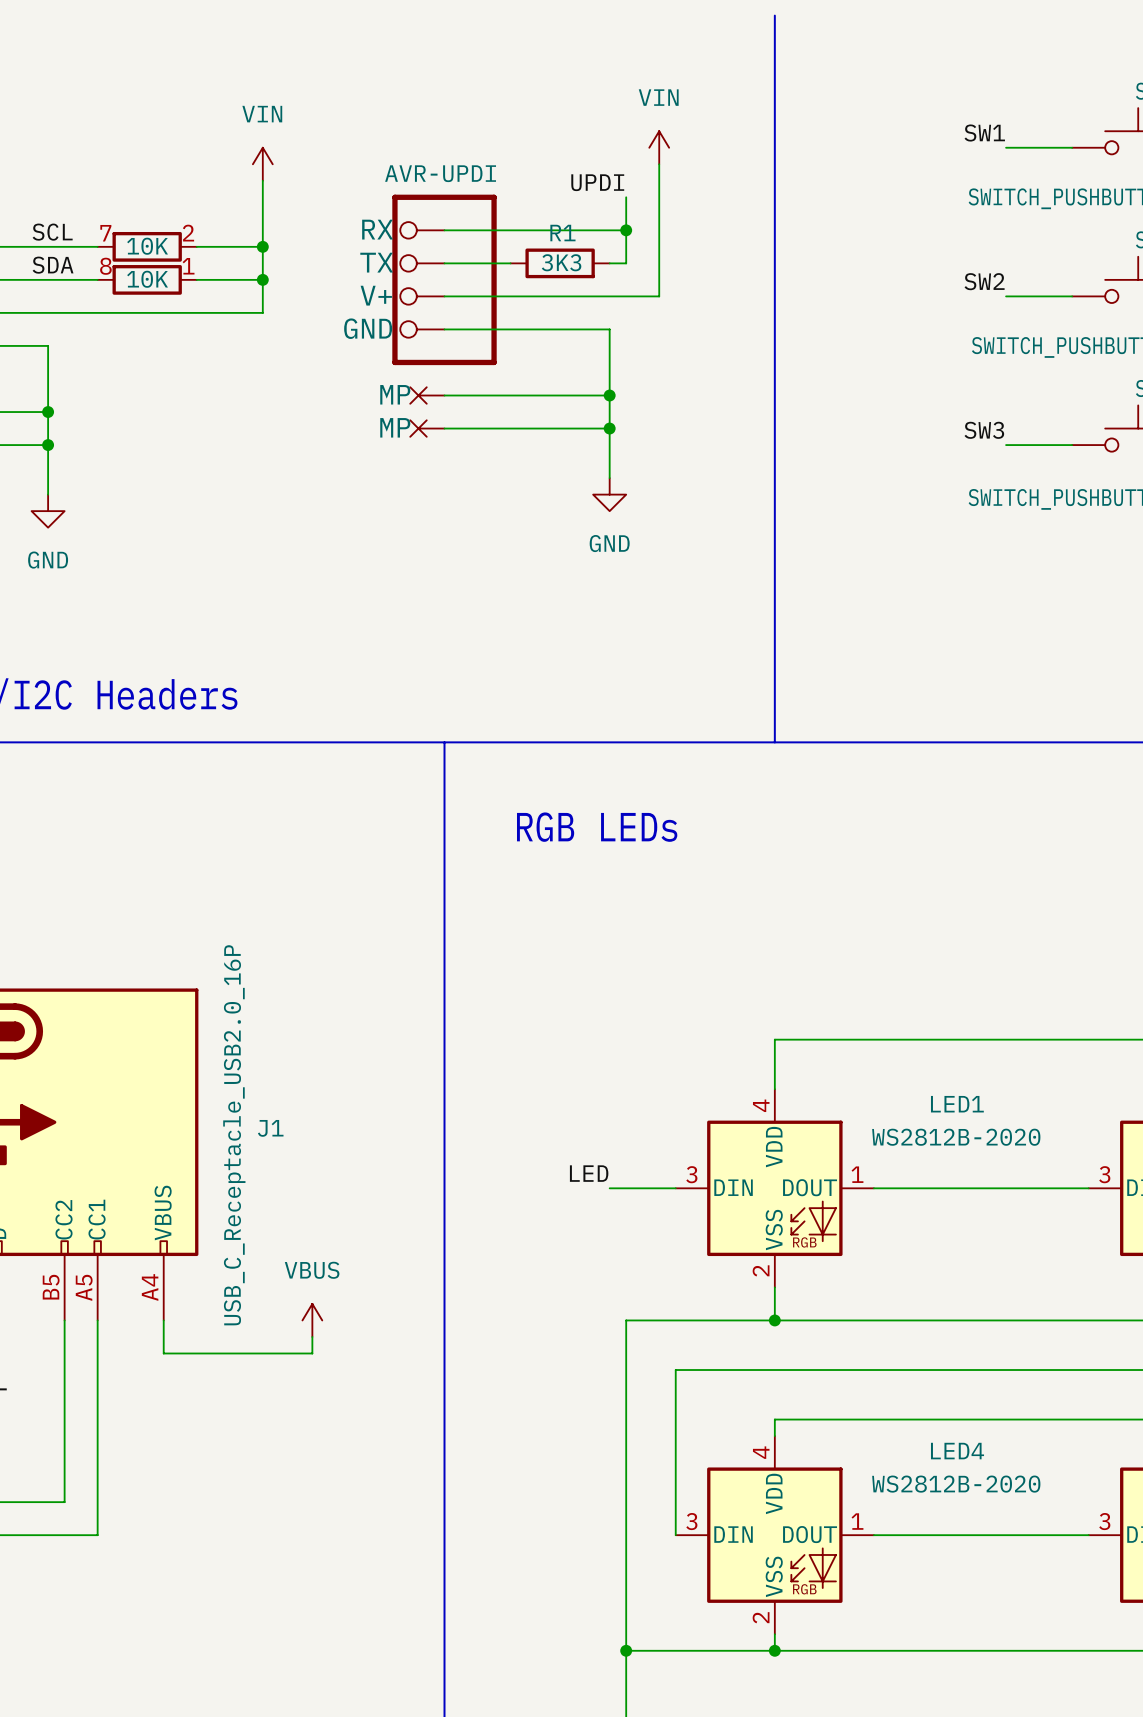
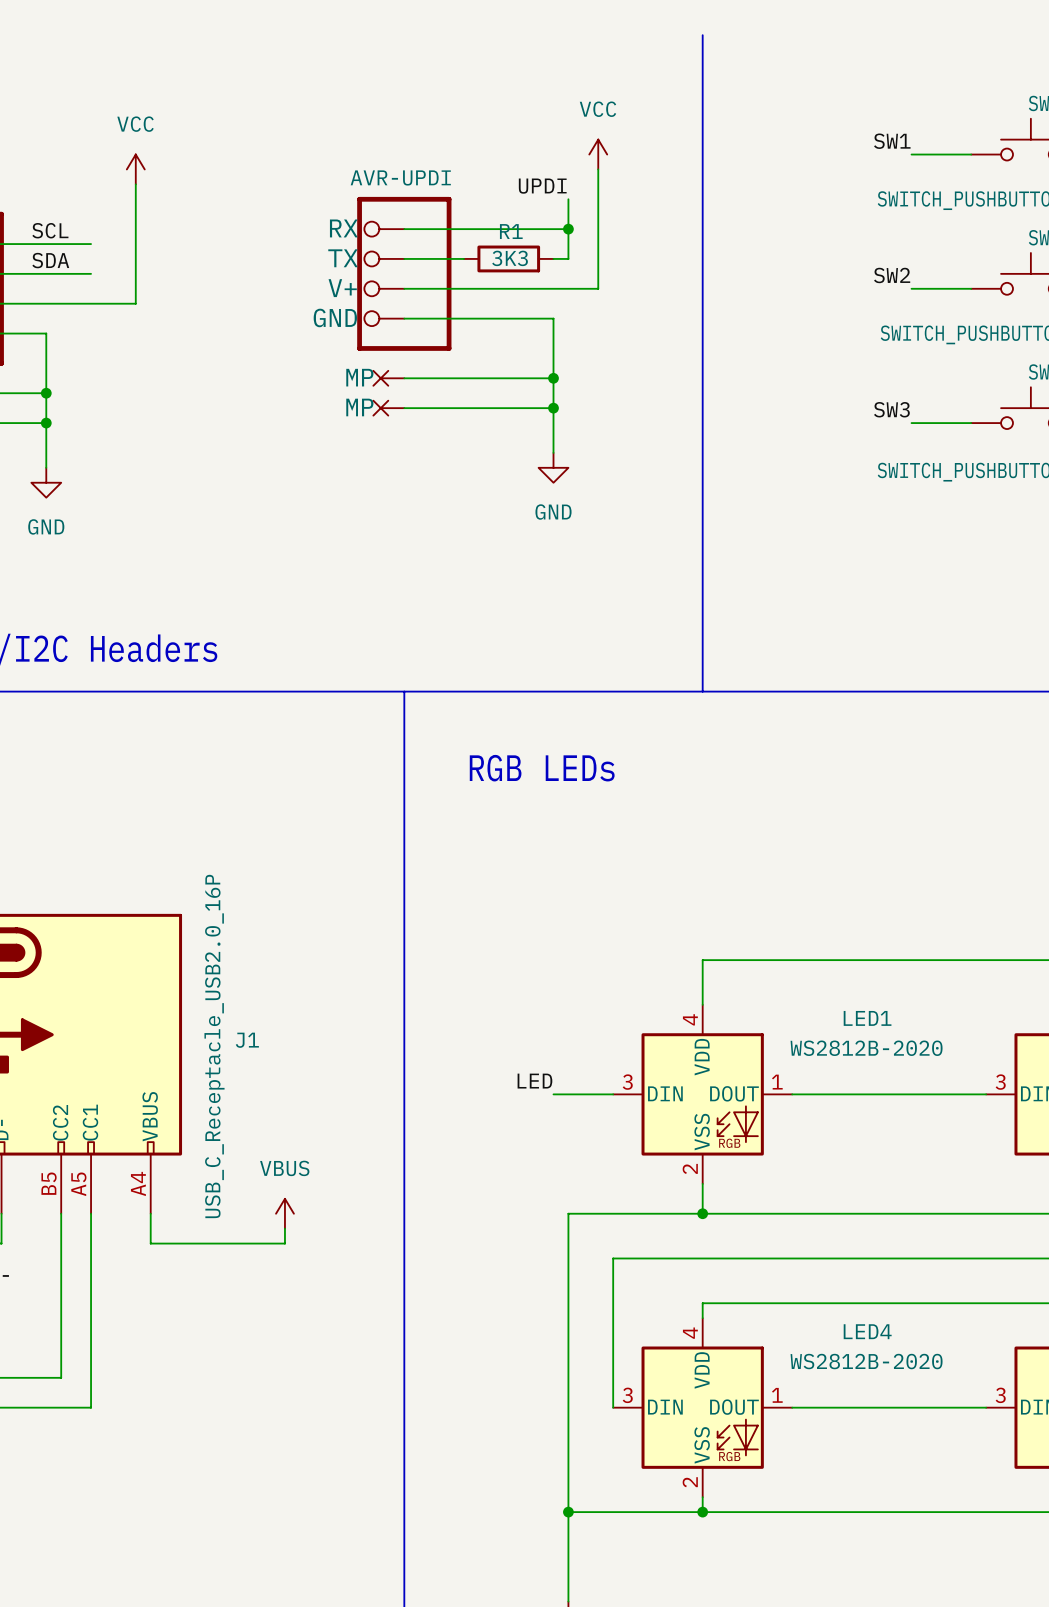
power symbol: VIN (659, 147) -> VCC (598, 154)
power symbol: none -> VCC (135, 169)
power symbol: VIN (262, 164) -> none
wire: (262, 180) (262, 312) (147, 312) -> (135, 184) (135, 303)
part: 10K (147, 246) -> none
wire: (196, 246) (262, 246) -> none
junction: (262, 246) -> none
part: 10K (147, 279) -> none
wire: (196, 279) (262, 279) -> none
junction: (262, 279) -> none

